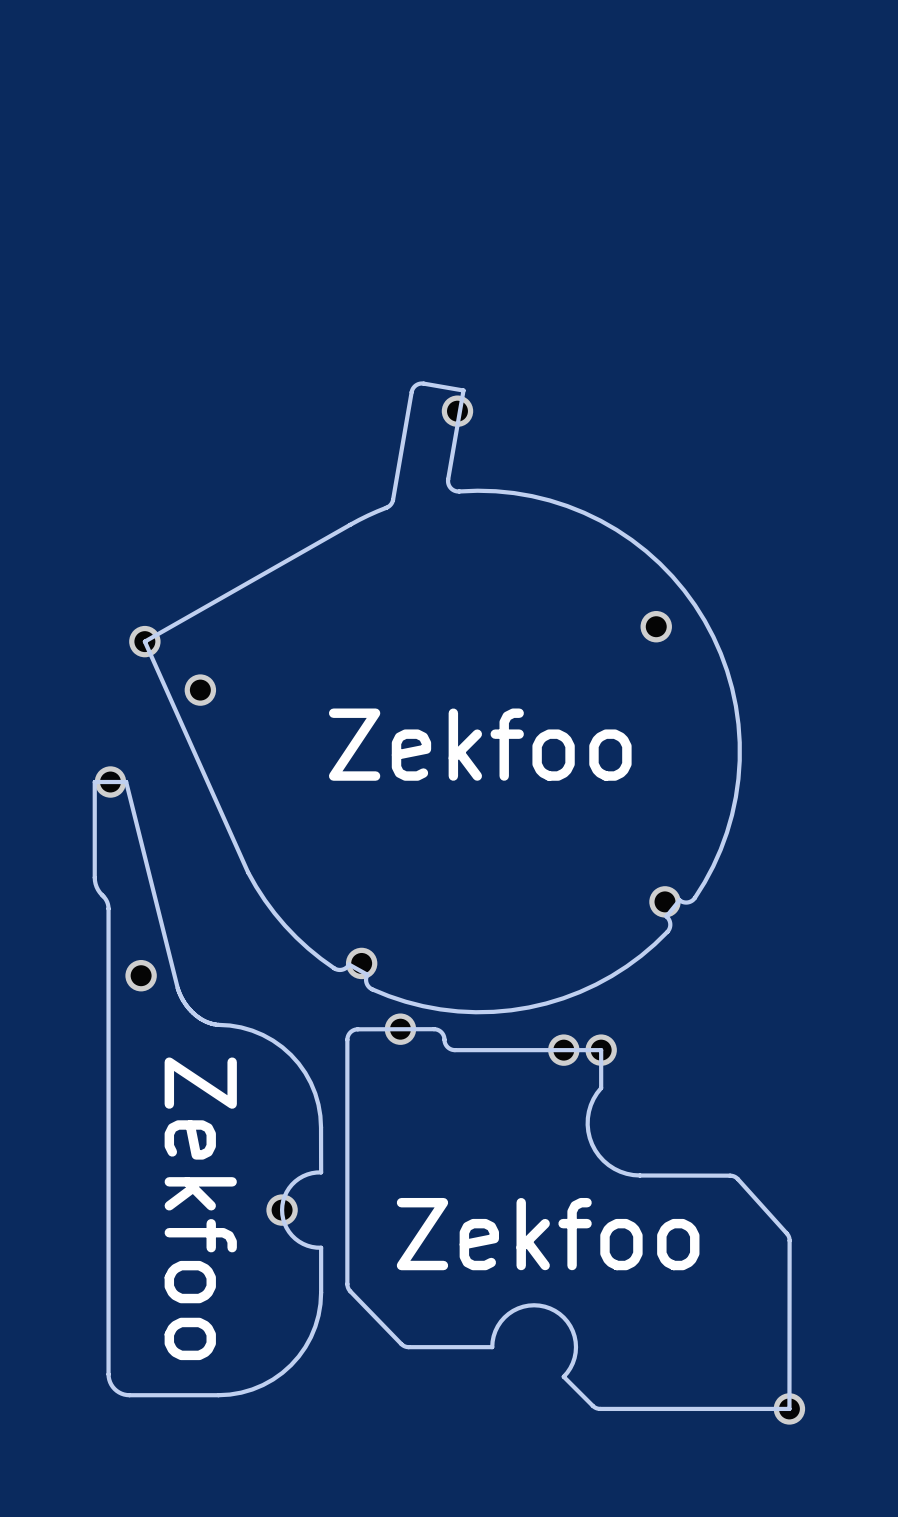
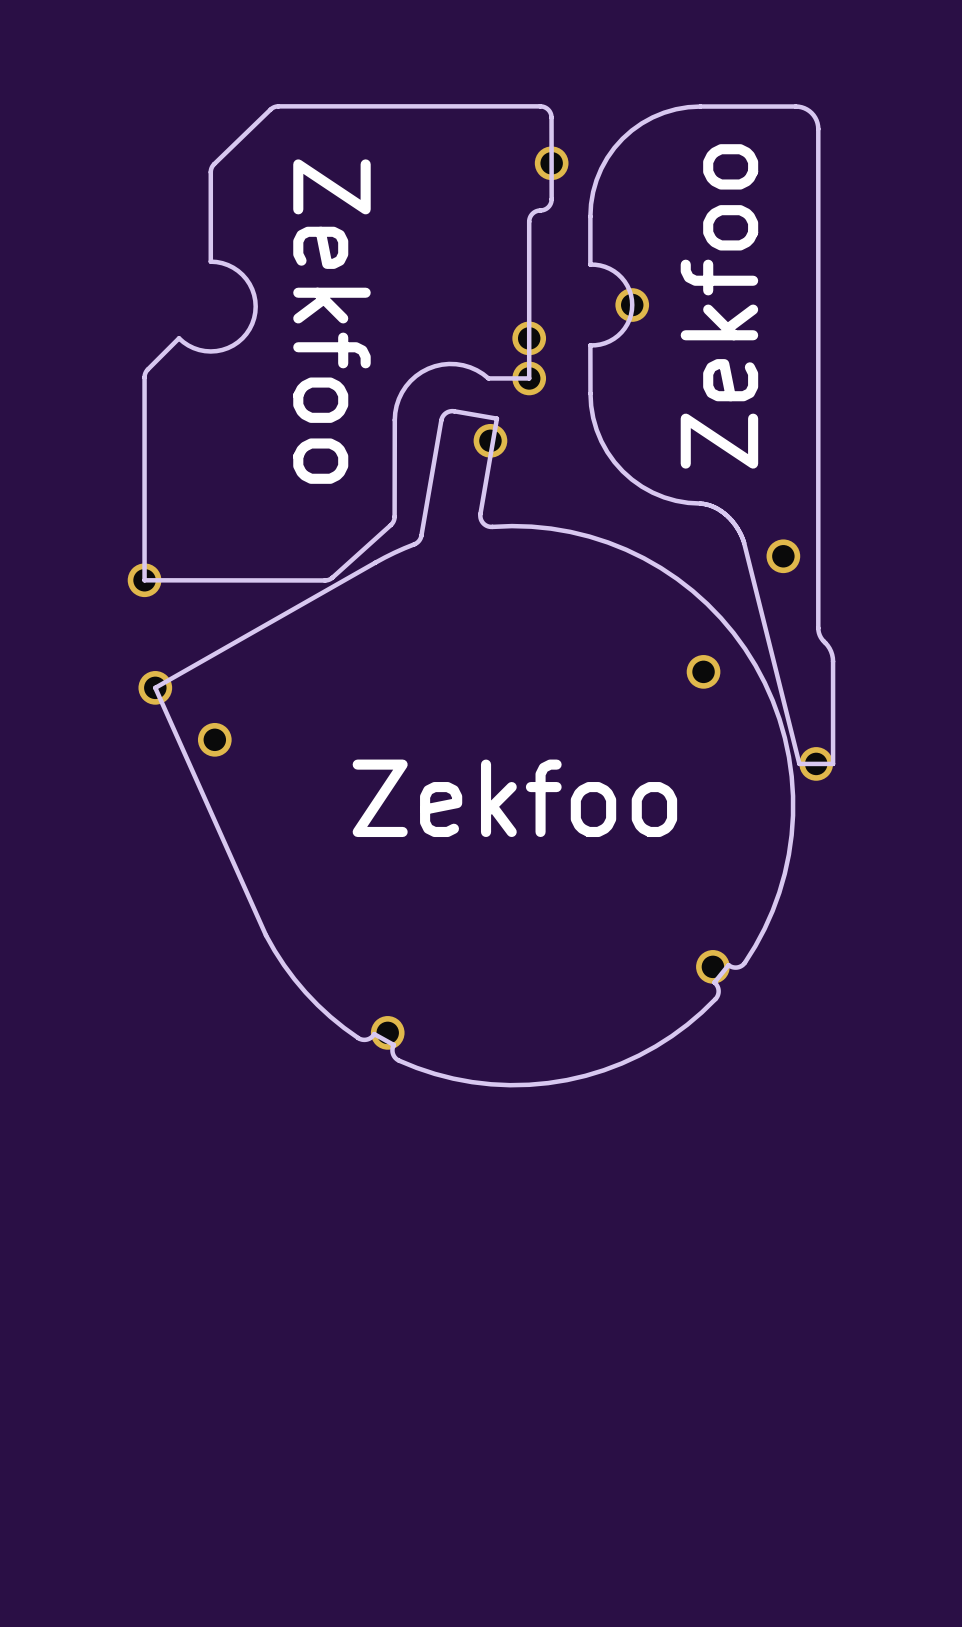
board edge: none -> (540, 106) (276, 106) (270, 109) (213, 164) (210, 172) (210, 261) (227, 265) (242, 274) (252, 289) (255, 300) (255, 312) (249, 329) (242, 338) (233, 345) (222, 349) (204, 351) (193, 348) (179, 338) (145, 373) (144, 580) (330, 579) (393, 521) (395, 412) (398, 398) (410, 381) (428, 368) (449, 363) (470, 367) (488, 378) (529, 378) (529, 220) (533, 212) (548, 207) (551, 199) (551, 116) (548, 109) (540, 106)
board edge: none -> (795, 106) (700, 106) (675, 109) (641, 123) (622, 138) (607, 158) (596, 180) (591, 204) (590, 264) (609, 268) (621, 277) (631, 295) (631, 309) (627, 324) (618, 335) (605, 343) (590, 345) (591, 405) (601, 441) (614, 462) (631, 479) (664, 497) (712, 506) (725, 514) (736, 526) (744, 542) (799, 763) (833, 763) (832, 658) (829, 648) (819, 635) (818, 628) (818, 128) (816, 120) (811, 113) (804, 108) (795, 106)
part: none -> (551, 163)
part: none -> (632, 305)
text: none -> Zekfoo (719, 306)
text: none -> Zekfoo (331, 321)
part: none -> (529, 338)
part: none -> (529, 378)
part: none -> (783, 556)
part: none -> (144, 580)
part: none -> (816, 763)
part: (110, 782) -> none
board edge: (126, 782) (177, 988) (183, 1001) (192, 1012) (204, 1021) (252, 1030) (282, 1047) (305, 1072) (318, 1104) (321, 1127) (321, 1172) (303, 1176) (291, 1184) (284, 1196) (282, 1210) (284, 1223) (291, 1235) (307, 1245) (321, 1247) (321, 1292) (318, 1315) (305, 1347) (291, 1365) (273, 1379) (241, 1392) (218, 1395) (126, 1395) (114, 1389) (108, 1377) (108, 908) (107, 902) (98, 889) (94, 880) (94, 782) (126, 782) -> none
part: (141, 975) -> none
part: (400, 1029) -> none
board edge: (434, 1029) (356, 1029) (351, 1031) (347, 1037) (347, 1284) (350, 1291) (401, 1343) (407, 1347) (492, 1347) (497, 1326) (513, 1310) (534, 1305) (550, 1308) (567, 1321) (574, 1336) (574, 1357) (563, 1376) (597, 1408) (789, 1408) (789, 1238) (737, 1179) (730, 1175) (633, 1175) (614, 1168) (603, 1160) (592, 1144) (587, 1124) (590, 1105) (601, 1088) (601, 1050) (453, 1050) (446, 1046) (441, 1032) (434, 1029) -> none
part: (563, 1050) -> none
part: (601, 1050) -> none
text: Zekfoo (200, 1208) -> none
part: (282, 1210) -> none
text: Zekfoo (548, 1234) -> none
part: (789, 1408) -> none

